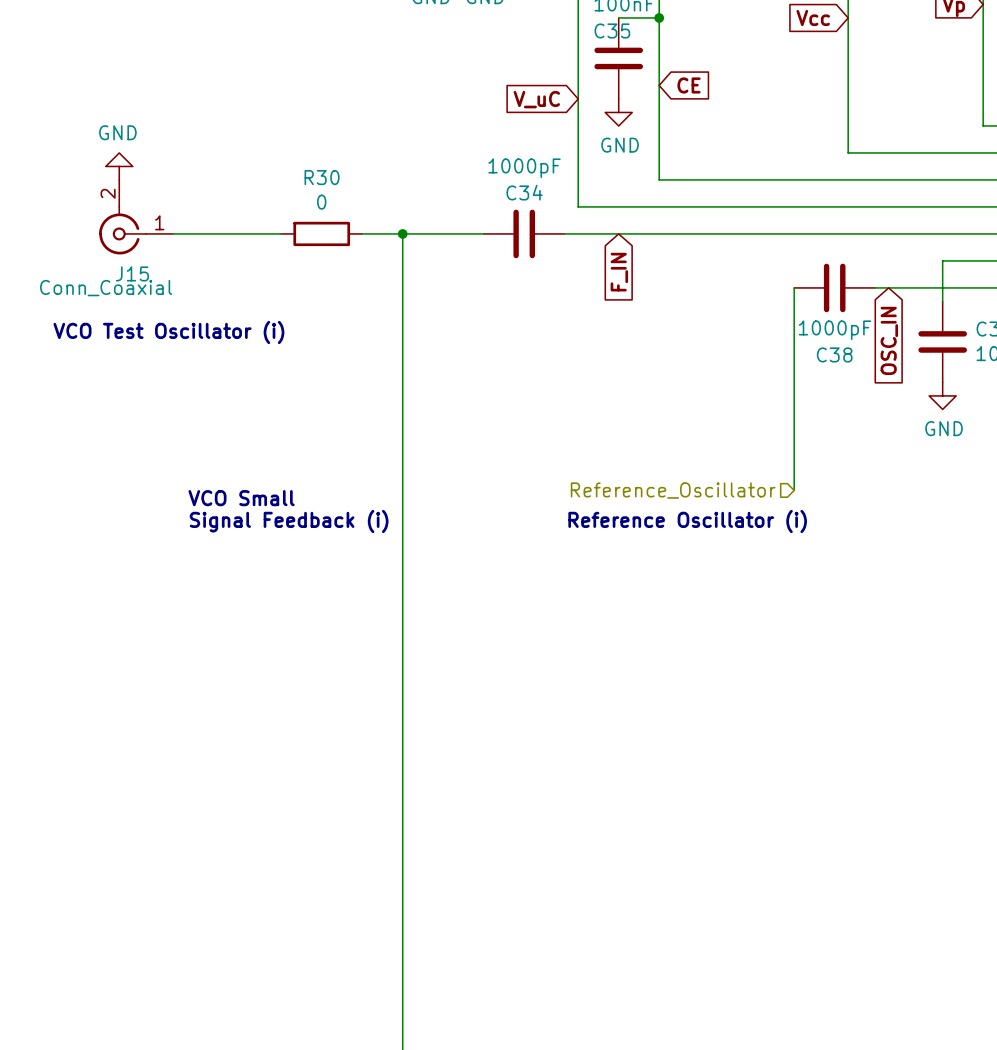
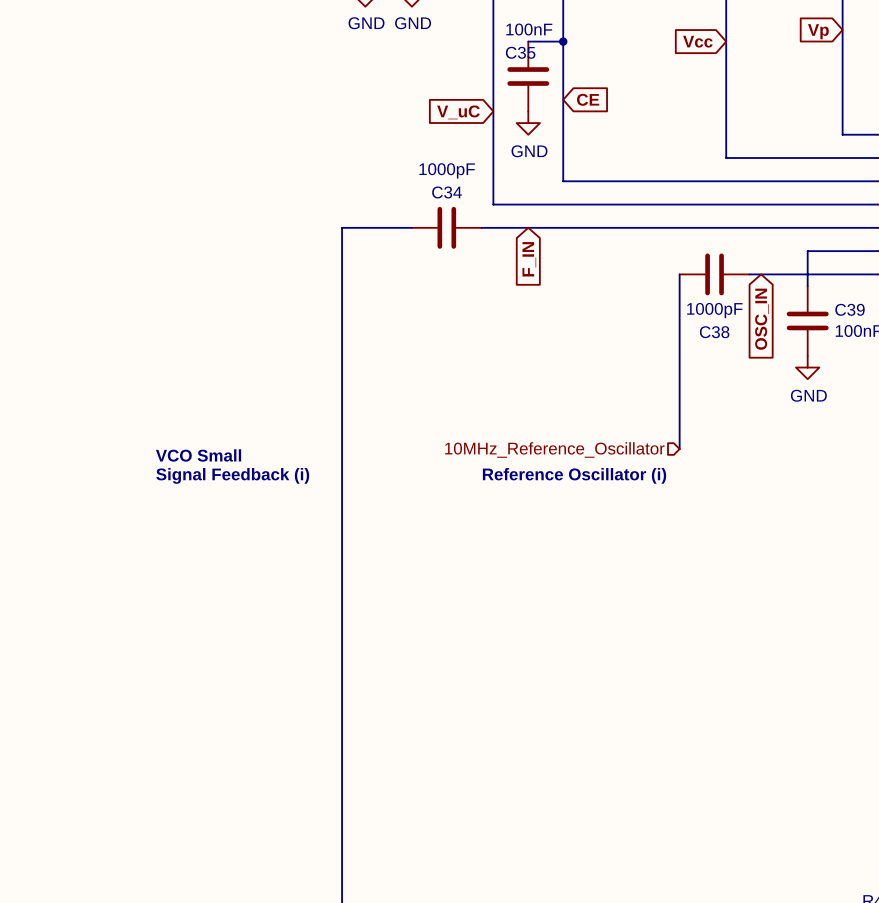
power symbol: GND (119, 166) -> none
J15: Conn_Coaxial (136, 217) -> none
wire: (173, 233) (281, 233) -> none
R30: 0 (321, 233) -> none
wire: (362, 233) (402, 233) -> none
junction: (402, 233) -> none
text: VCO Test Oscillator (i) (168, 332) -> none
hierarchical label: Reference_Oscillator (673, 490) -> 10MHz_Reference_Oscillator (554, 449)

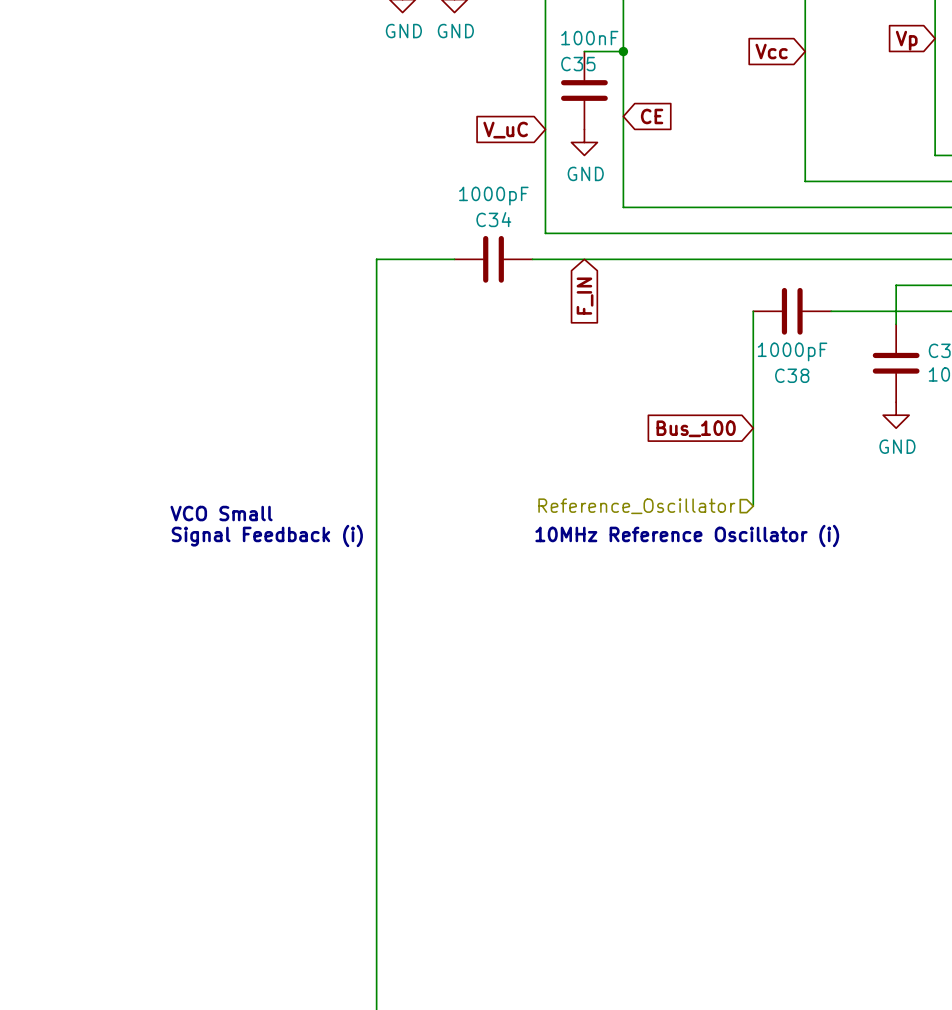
global label: OSC_IN (762, 319) -> none
global label: none -> Bus_100 (696, 428)
hierarchical label: 10MHz_Reference_Oscillator (554, 449) -> Reference_Oscillator (636, 506)
text: Reference Oscillator (i) (574, 475) -> 10MHz Reference Oscillator (i) (687, 536)

